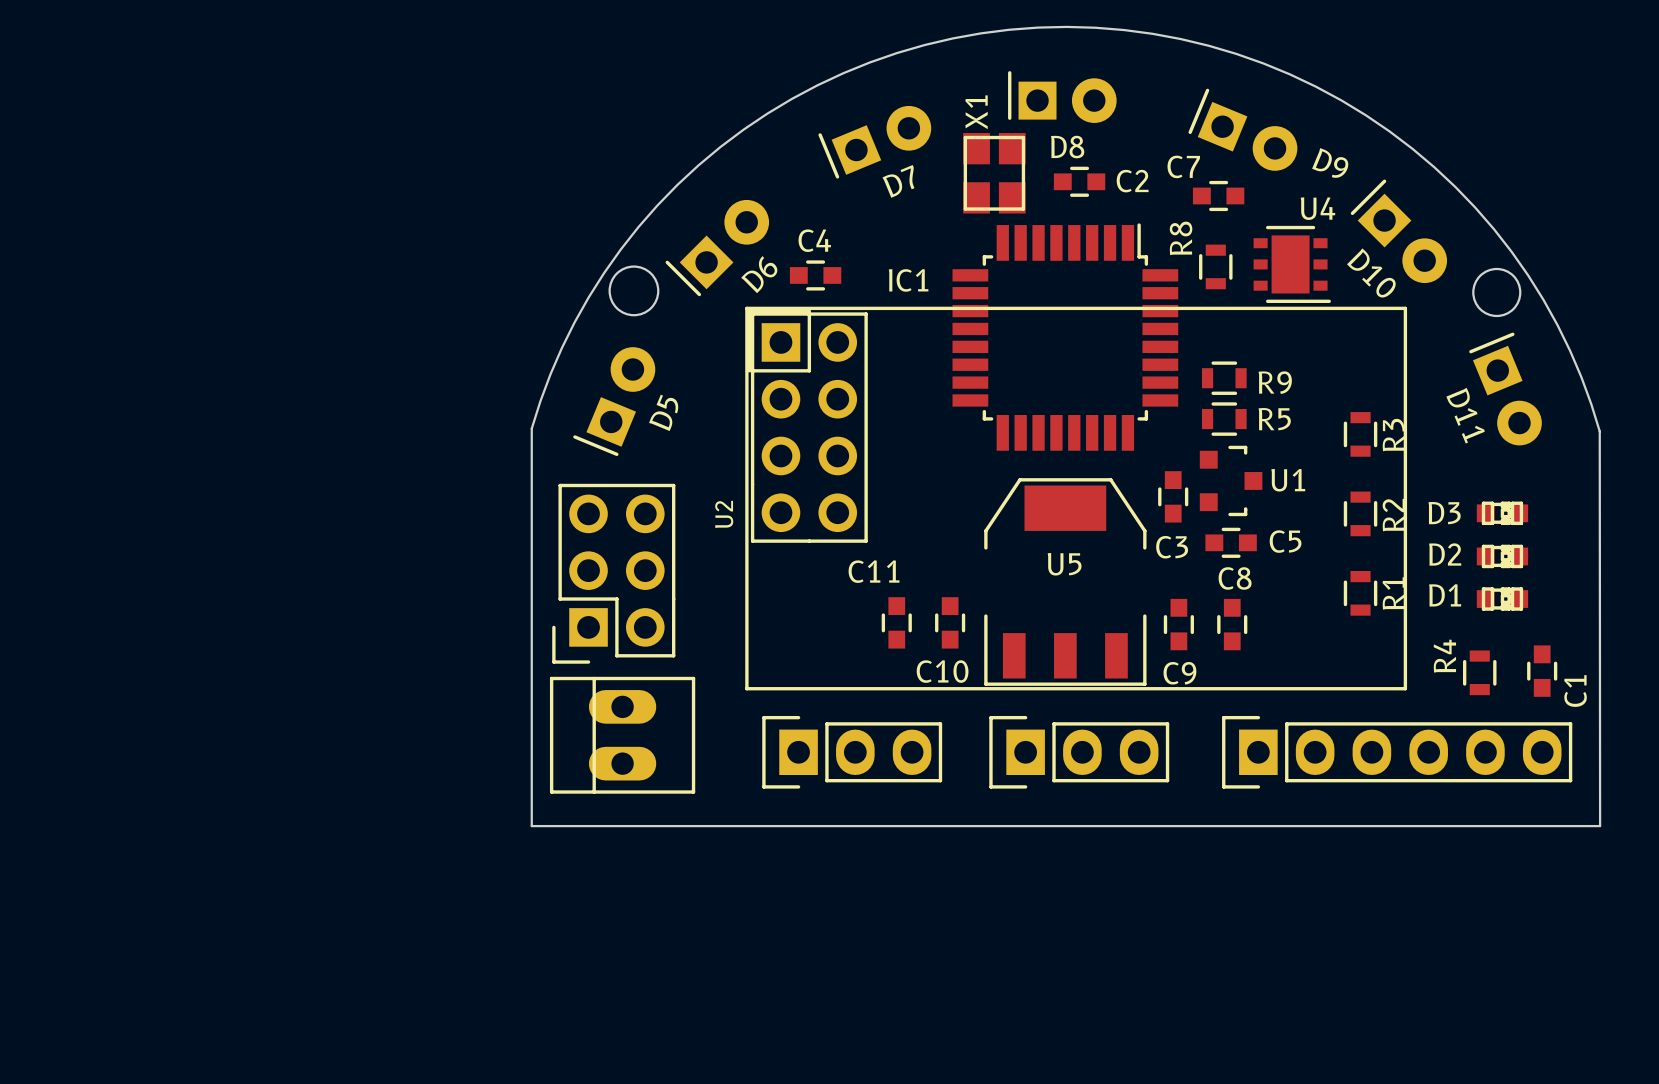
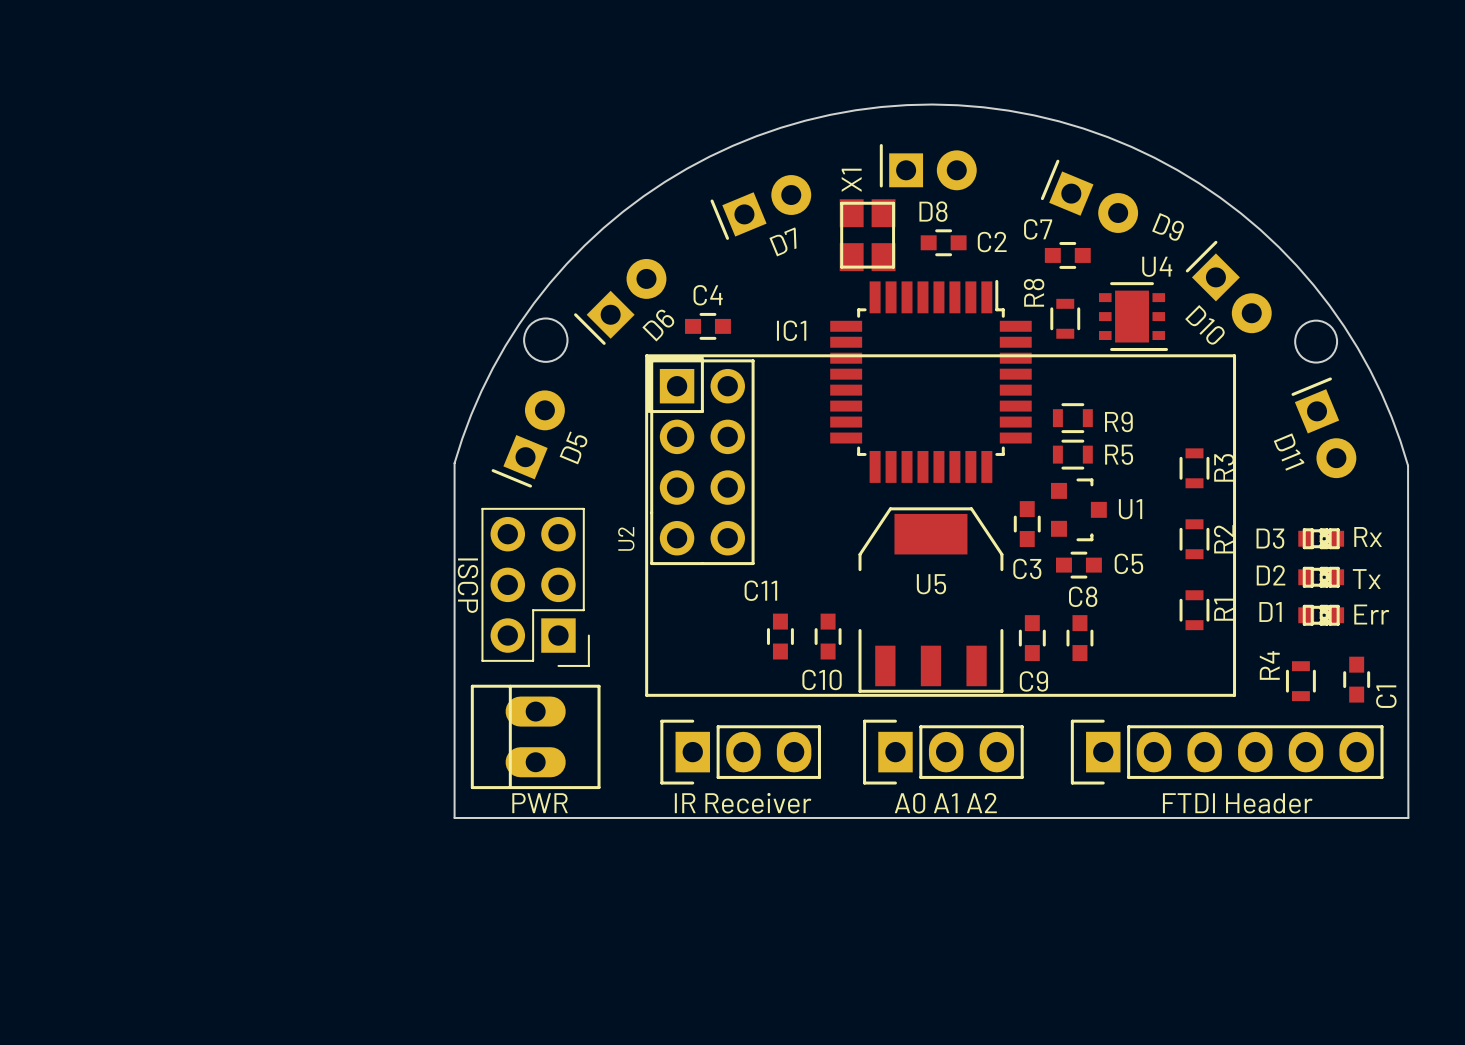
line: none -> (482, 508) (482, 660) (533, 660) (533, 610) (583, 610) (583, 508) (482, 508)
text: none -> Rx (1368, 536)
text: none -> Tx (1366, 579)
text: none -> ISCP (467, 585)
part side: top (613, 573) -> bottom (533, 584)
text: none -> Err (1371, 614)
line: none -> (588, 635) (588, 665) (558, 665)
text: none -> FTDI Header (1237, 803)
text: none -> PWR (540, 803)
text: none -> IR Receiver (743, 803)
text: none -> A0 A1 A2 (945, 803)

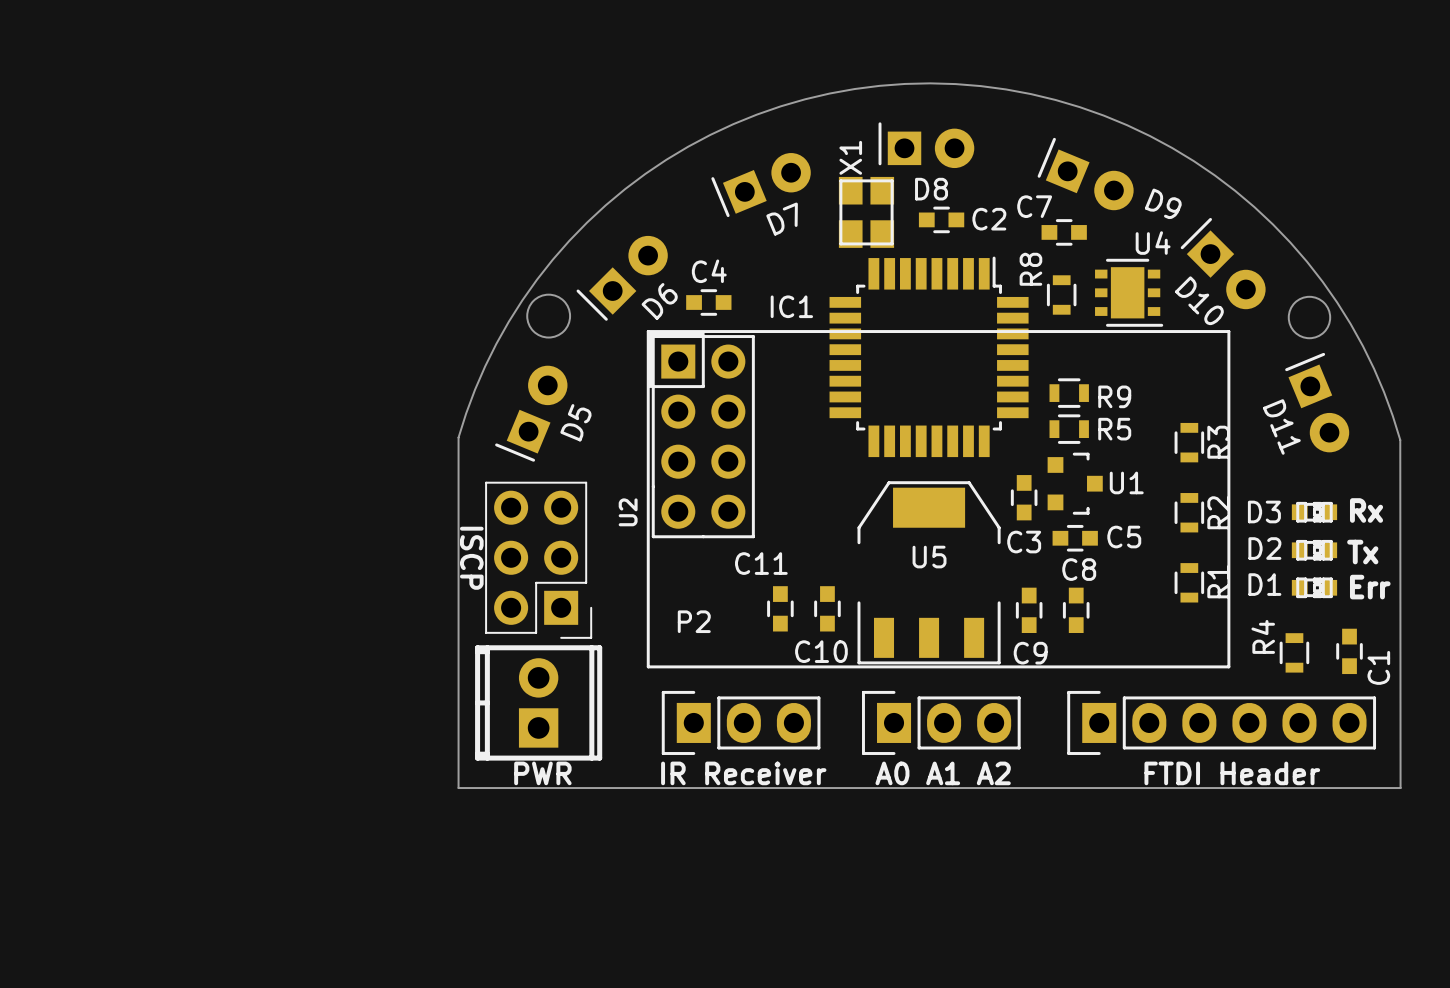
P2 name: none -> P2 (694, 621)
part footprint: [470, 684, 601, 790] -> [475, 645, 603, 761]

